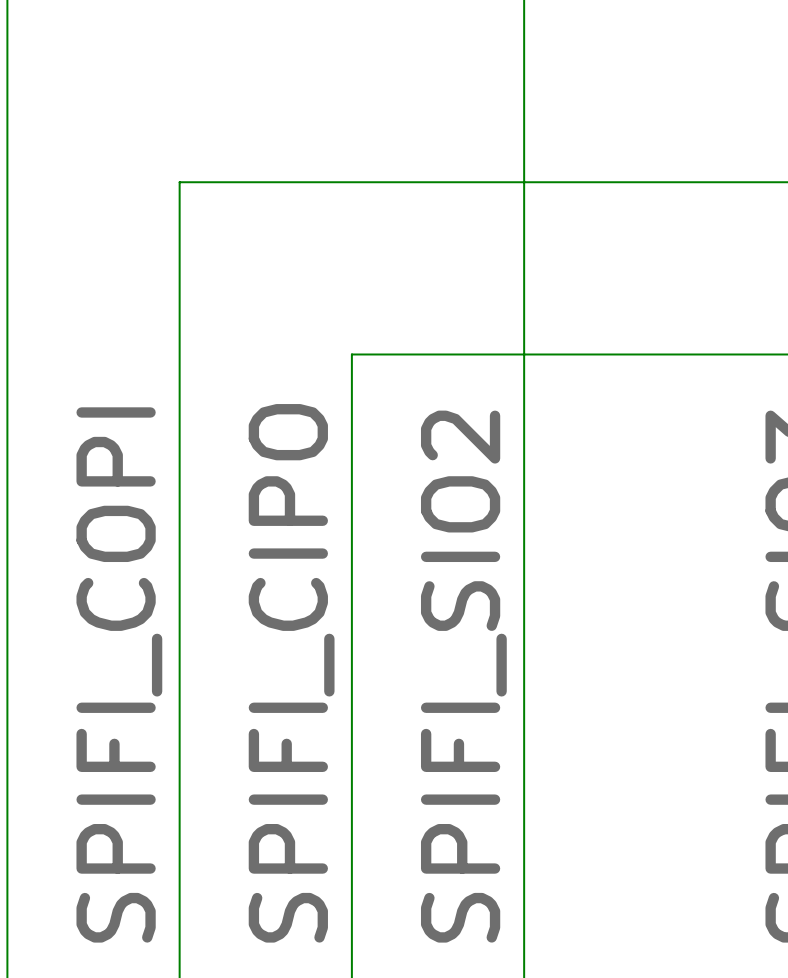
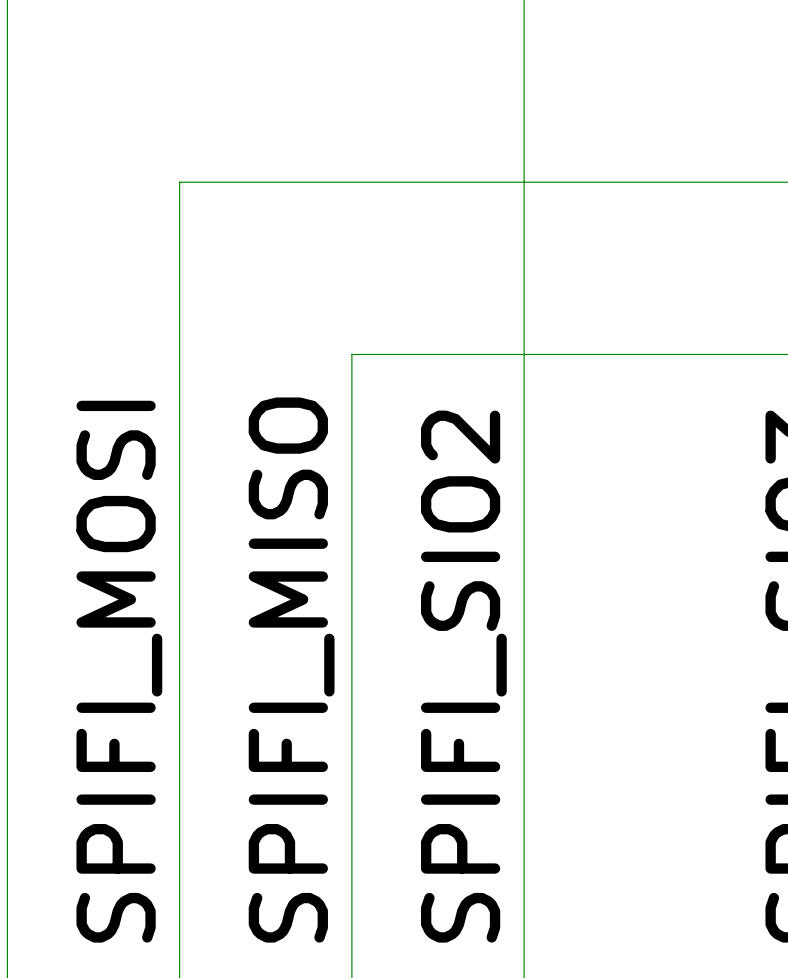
label: SPIFI_CIPO (291, 673) -> SPIFI_MISO (291, 670)
label: SPIFI_COPI (119, 674) -> SPIFI_MOSI (119, 671)

